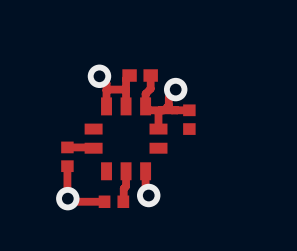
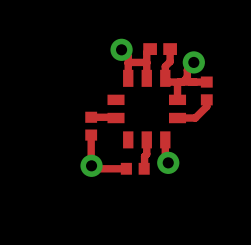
top track: none -> (206, 99) (206, 106) (195, 118) (177, 118)

